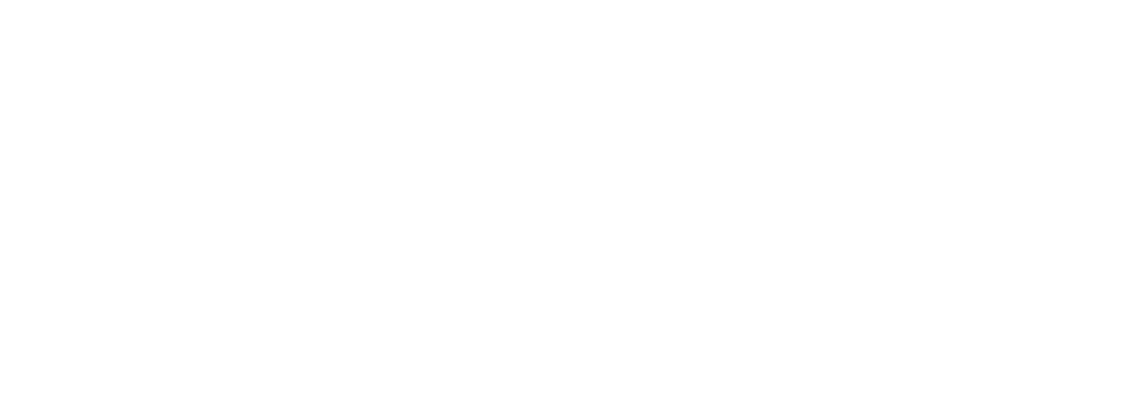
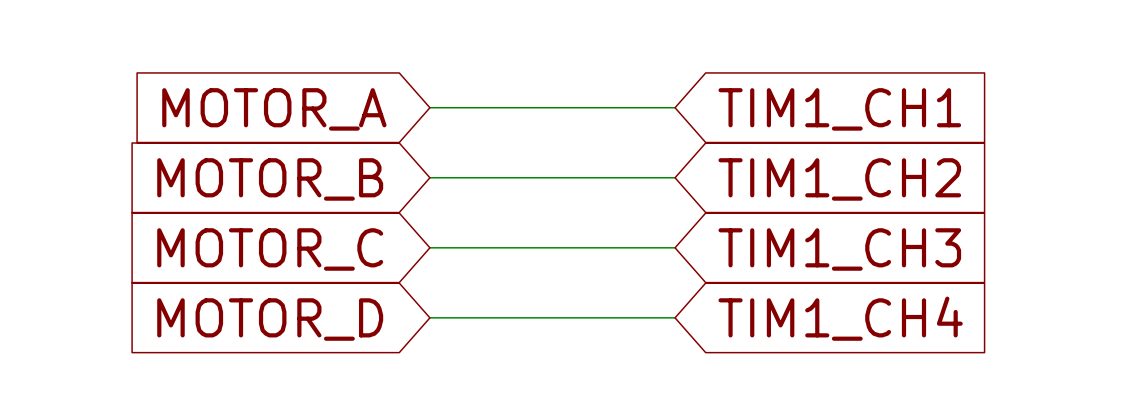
wire: none -> (429, 107) (675, 107)
global label: none -> MOTOR_A (274, 109)
global label: none -> TIM1_CH1 (839, 109)
wire: none -> (429, 177) (675, 177)
global label: none -> MOTOR_B (270, 179)
global label: none -> TIM1_CH2 (839, 179)
wire: none -> (429, 247) (675, 247)
global label: none -> MOTOR_C (270, 249)
global label: none -> TIM1_CH3 (839, 249)
wire: none -> (429, 317) (675, 317)
global label: none -> TIM1_CH4 (840, 318)
global label: none -> MOTOR_D (270, 319)

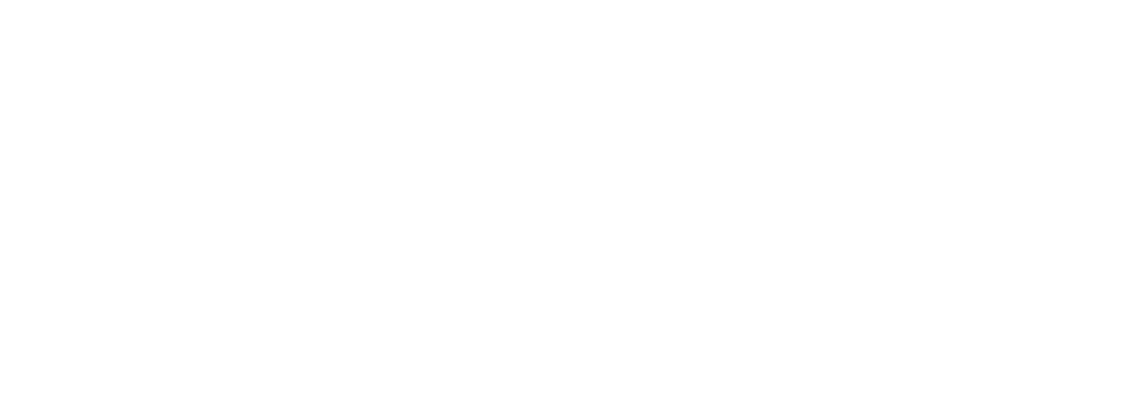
wire: (429, 107) (675, 107) -> none
global label: MOTOR_A (274, 109) -> none
global label: TIM1_CH1 (839, 109) -> none
wire: (429, 177) (675, 177) -> none
global label: MOTOR_B (270, 179) -> none
global label: TIM1_CH2 (839, 179) -> none
wire: (429, 247) (675, 247) -> none
global label: MOTOR_C (270, 249) -> none
global label: TIM1_CH3 (839, 249) -> none
wire: (429, 317) (675, 317) -> none
global label: TIM1_CH4 (840, 318) -> none
global label: MOTOR_D (270, 319) -> none

